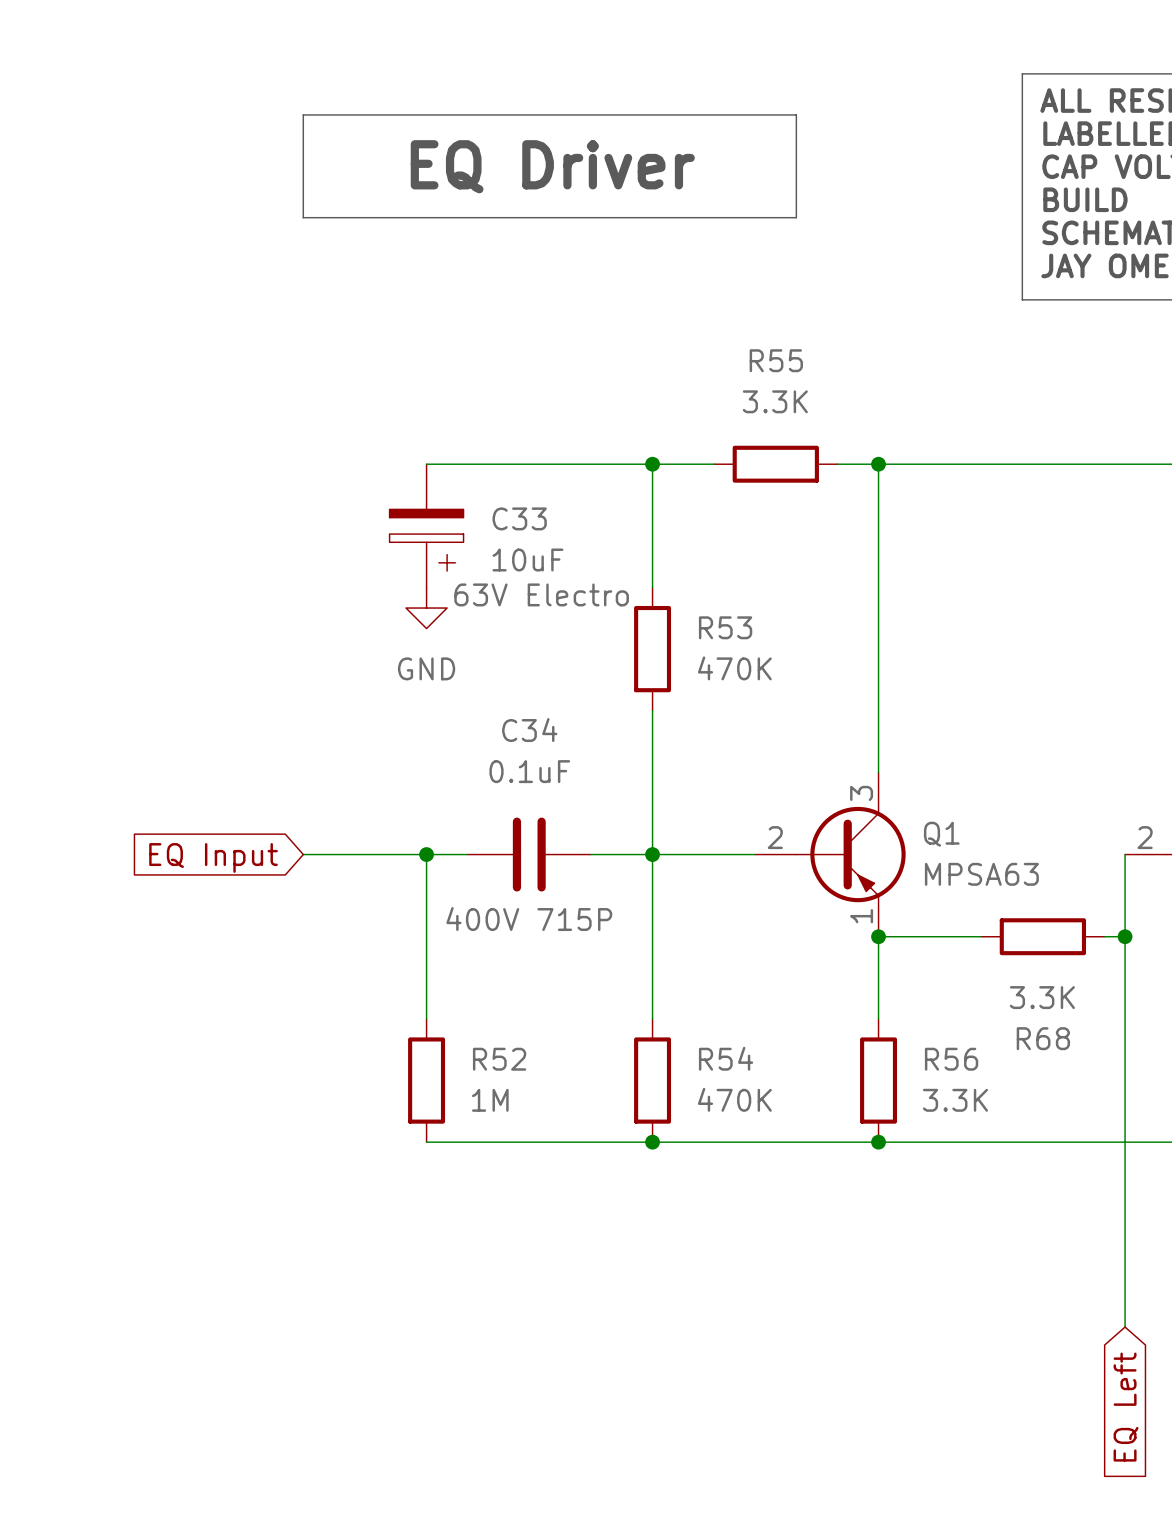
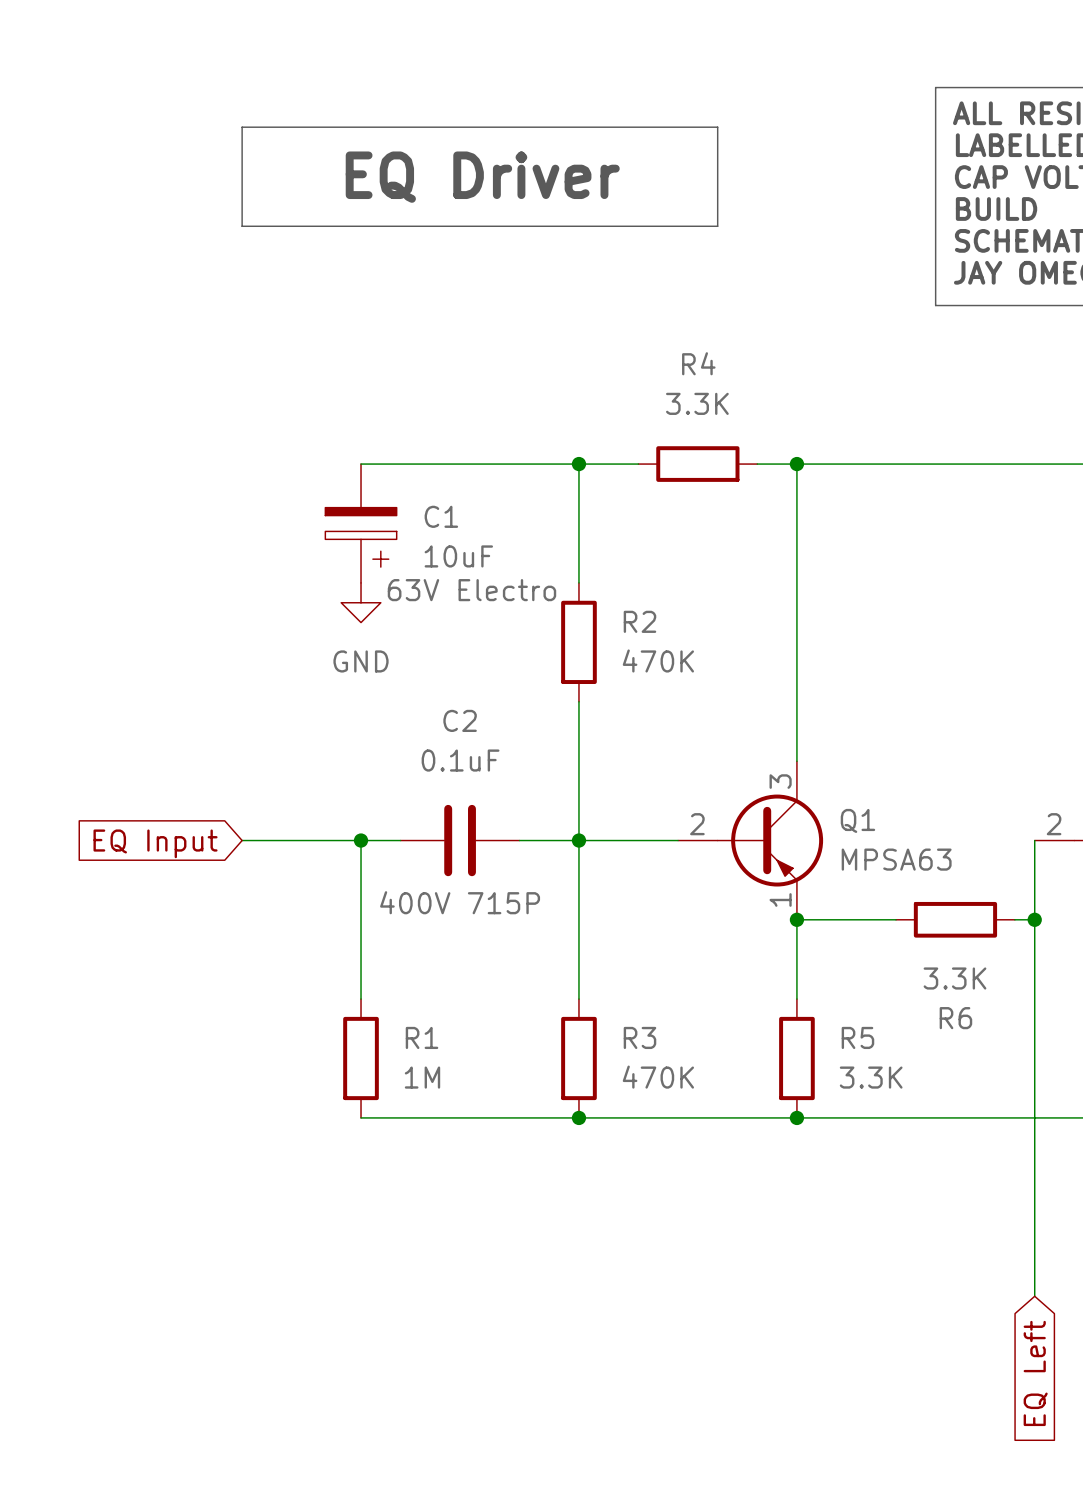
R55 name: R55 (776, 360) -> R4 (698, 363)
C33 name: C33 (519, 518) -> C1 (441, 516)
R53 name: R53 (725, 627) -> R2 (639, 621)
C34 name: C34 (529, 730) -> C2 (460, 720)
R68 name: R68 (1043, 1038) -> R6 (955, 1018)
R54 name: R54 (726, 1058) -> R3 (639, 1037)
R52 name: R52 (499, 1059) -> R1 (422, 1037)
R56 name: R56 (951, 1059) -> R5 (857, 1037)

